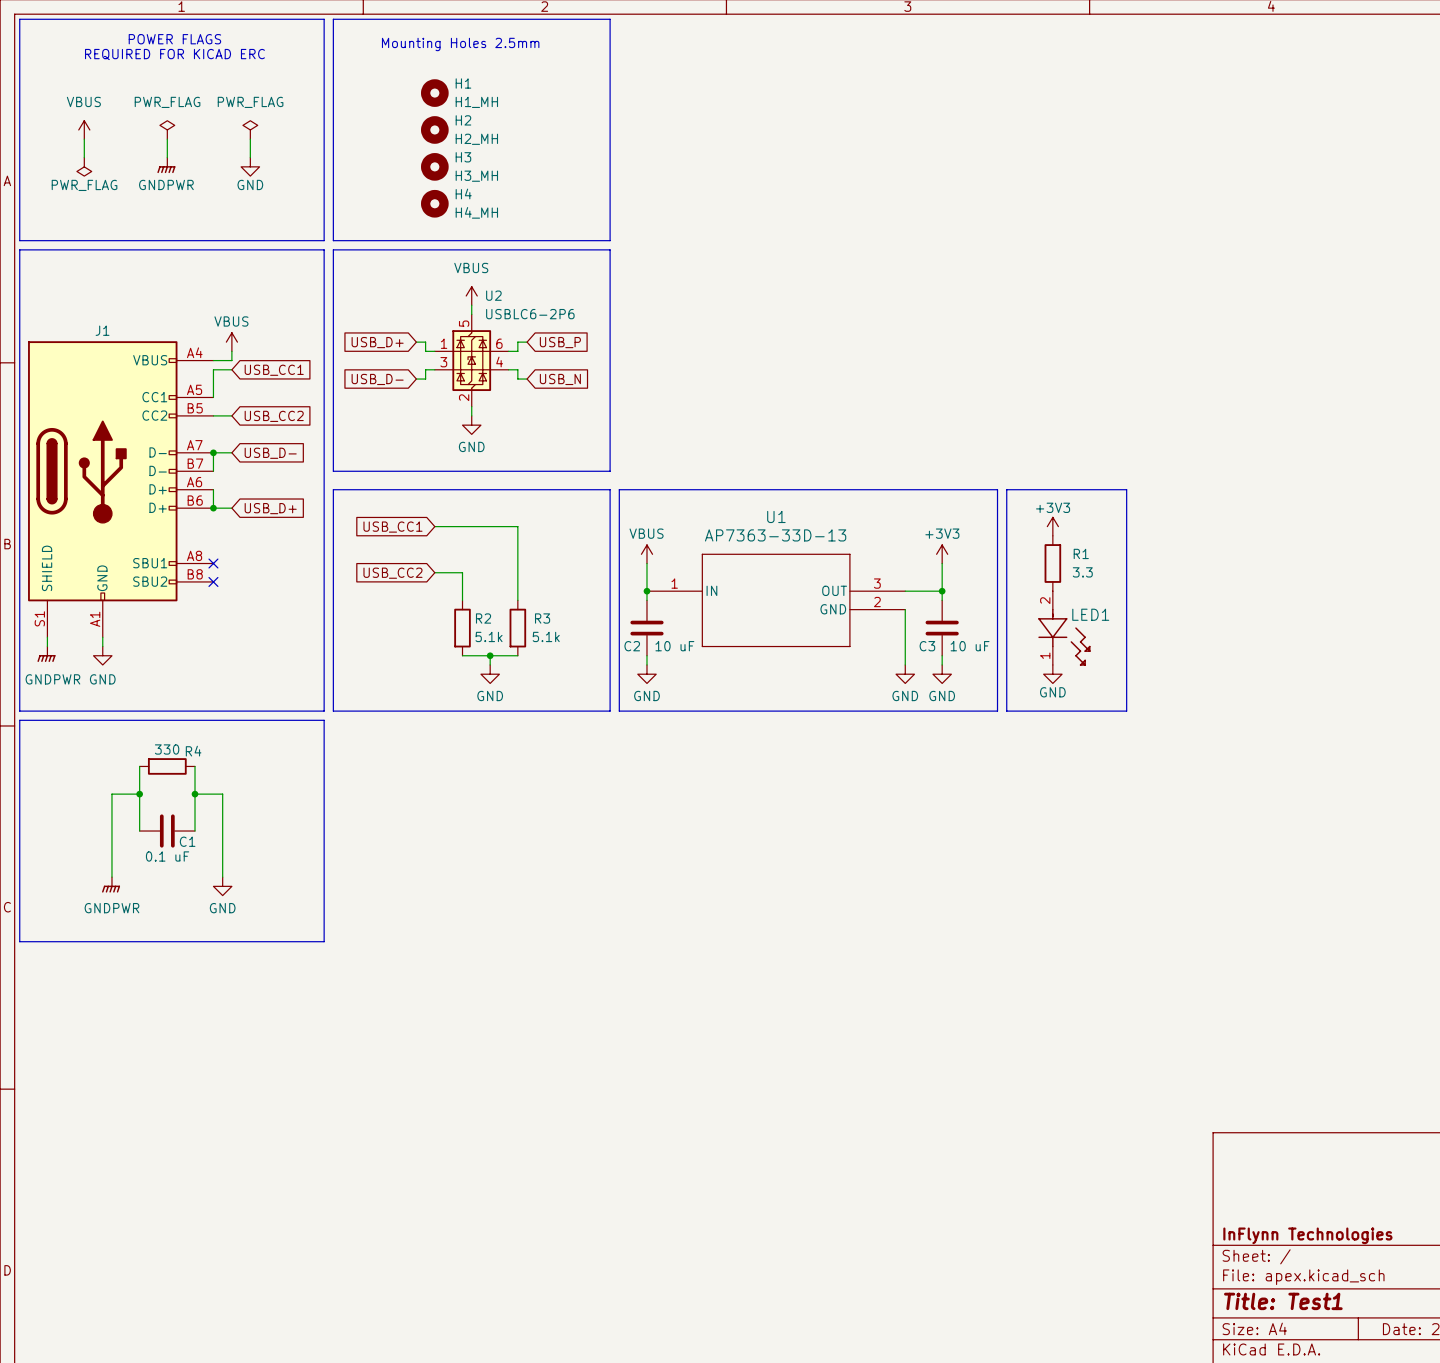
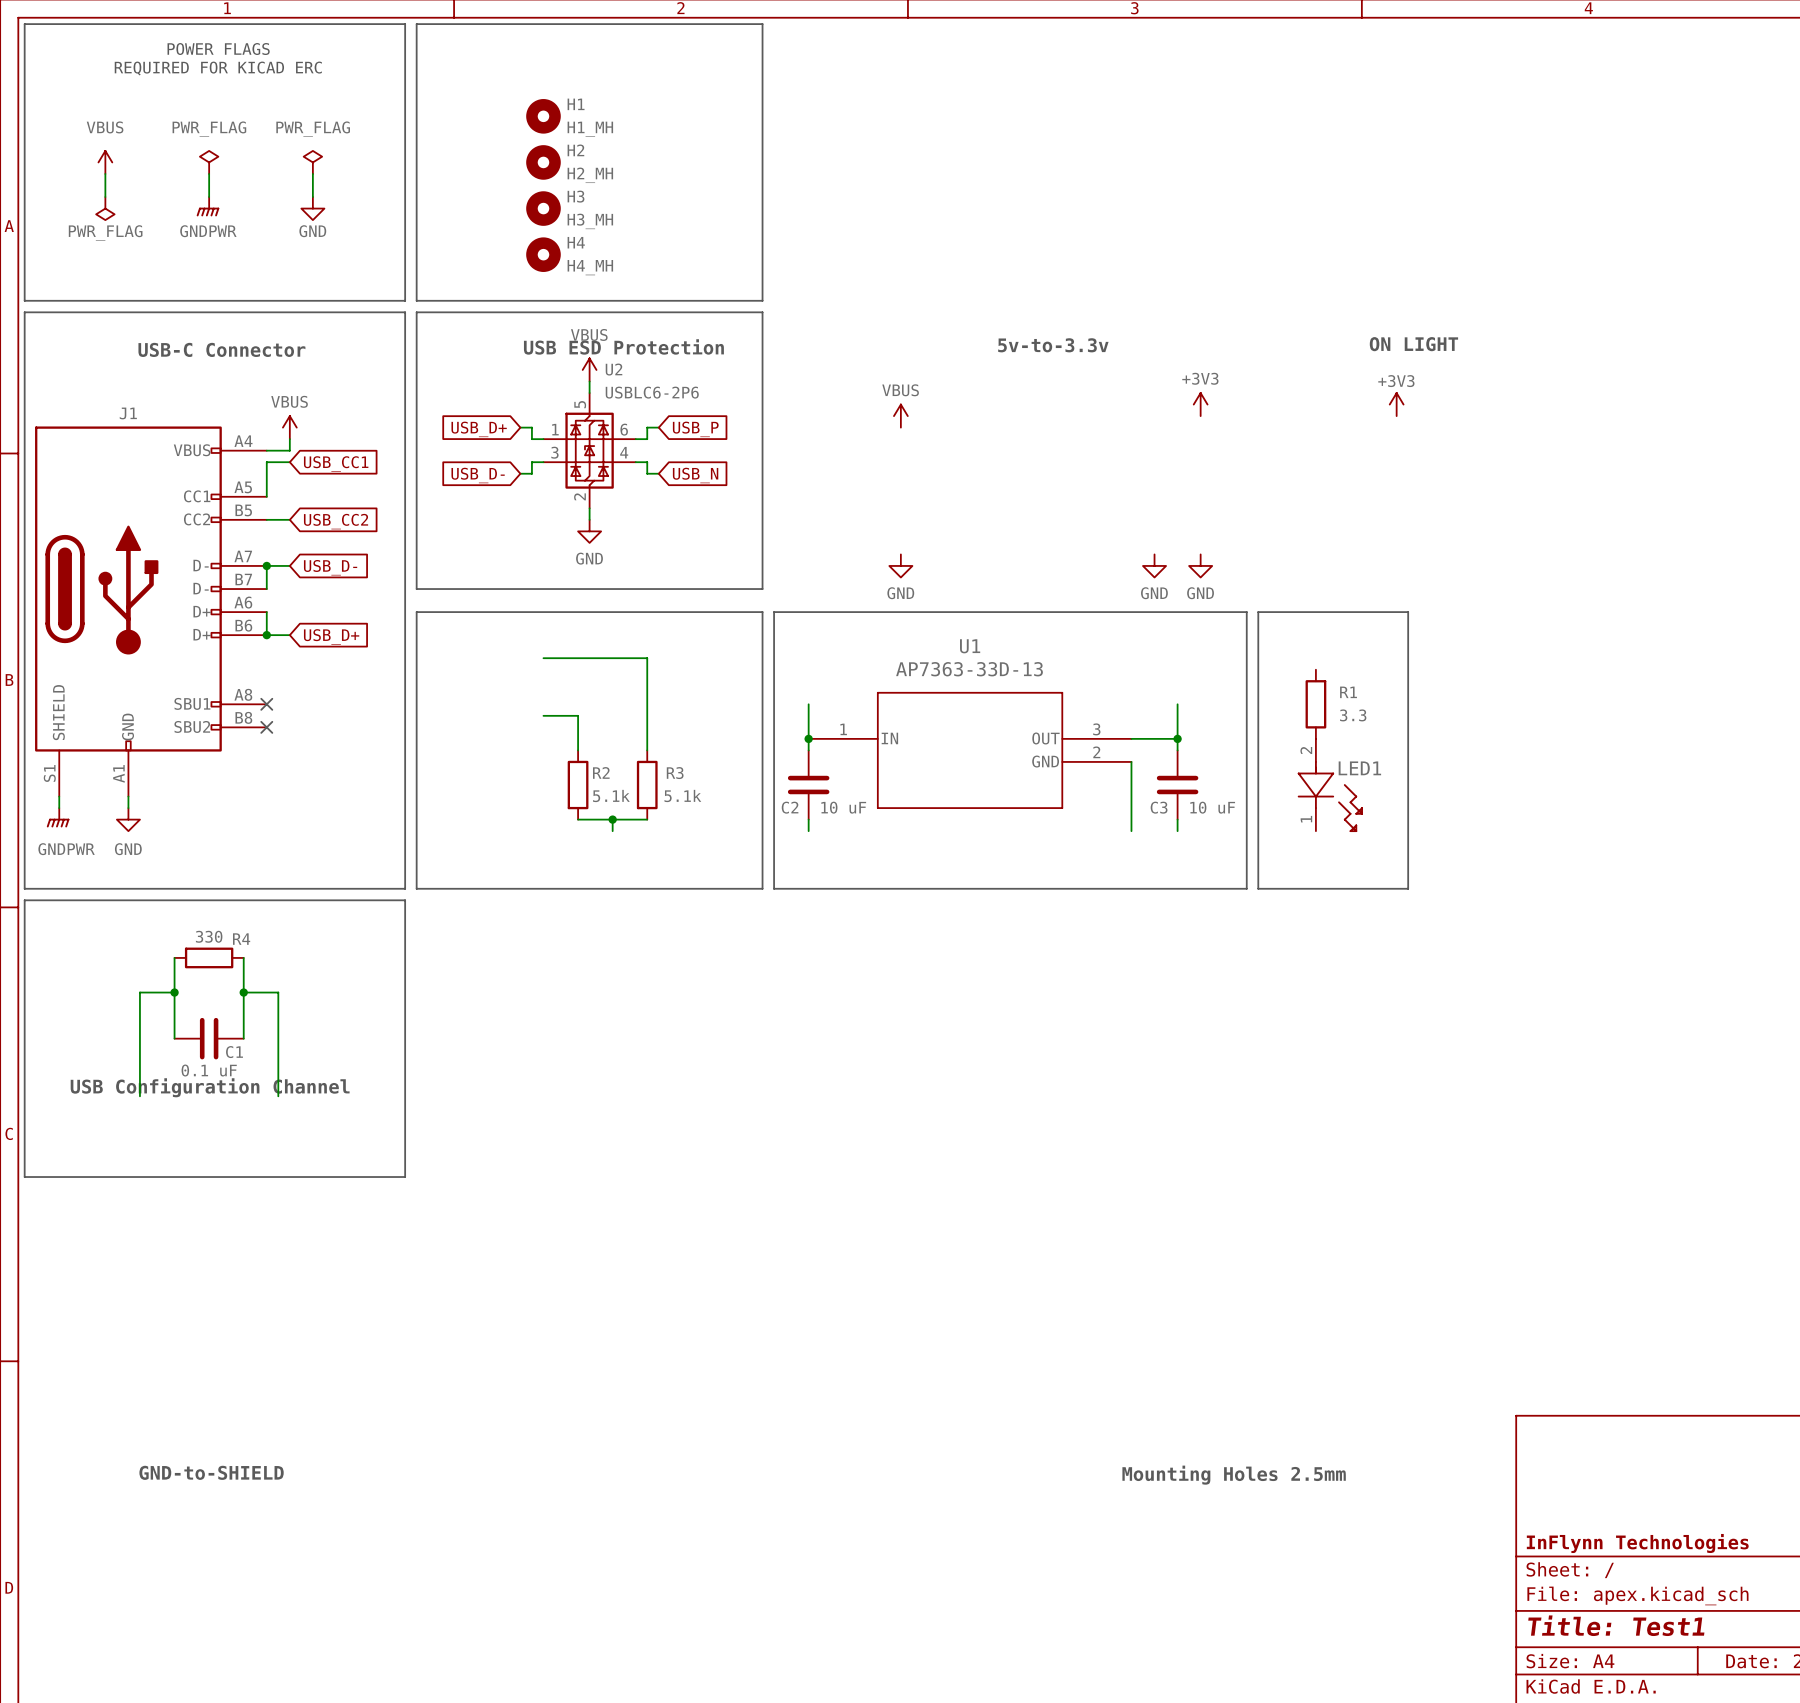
text: Mounting Holes 2.5mm (460, 44) -> none
text: none -> ON LIGHT (1413, 344)
text: none -> 5v-to-3.3v (1053, 345)
text: none -> USB ESD Protection (623, 346)
text: none -> USB-C Connector (221, 349)
power symbol: none -> +3V3 (1200, 404)
power symbol: none -> +3V3 (1396, 404)
power symbol: none -> VBUS (900, 416)
power symbol: none -> GND (900, 565)
power symbol: none -> GND (1154, 565)
power symbol: none -> GND (1200, 565)
power symbol: +3V3 (1052, 526) -> none
global label: USB_CC1 (392, 527) -> none
power symbol: VBUS (646, 554) -> none
power symbol: +3V3 (942, 554) -> none
global label: USB_CC2 (392, 573) -> none
power symbol: GND (490, 674) -> none
power symbol: GND (646, 674) -> none
power symbol: GND (905, 674) -> none
power symbol: GND (942, 674) -> none
power symbol: GND (1052, 674) -> none
text: none -> USB Configuration Channel (210, 1087)
power symbol: GNDPWR (111, 884) -> none
power symbol: GND (222, 886) -> none
text: none -> GND-to-SHIELD (211, 1472)
text: none -> Mounting Holes 2.5mm (1234, 1475)

